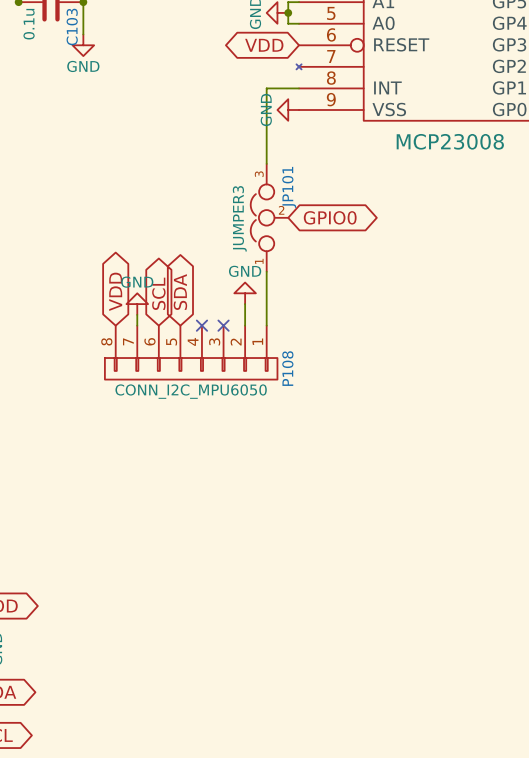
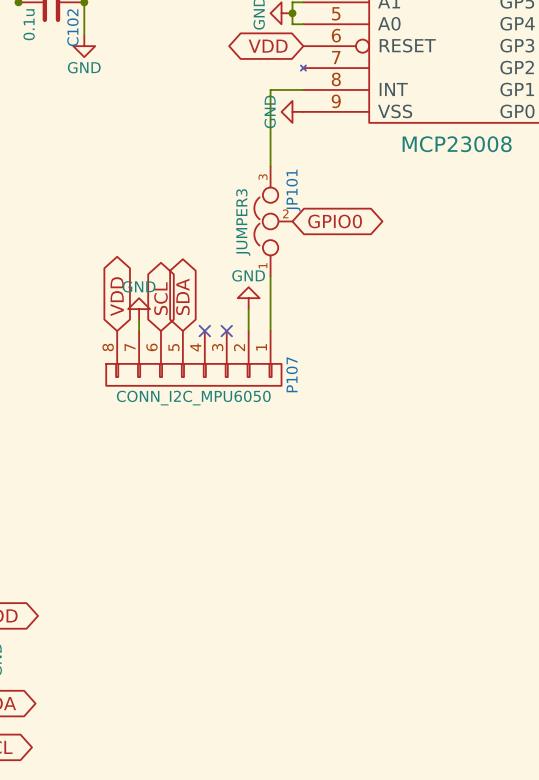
C103 name: C103 (72, 27) -> C102 (72, 27)
P108 name: P108 (287, 368) -> P107 (292, 374)

